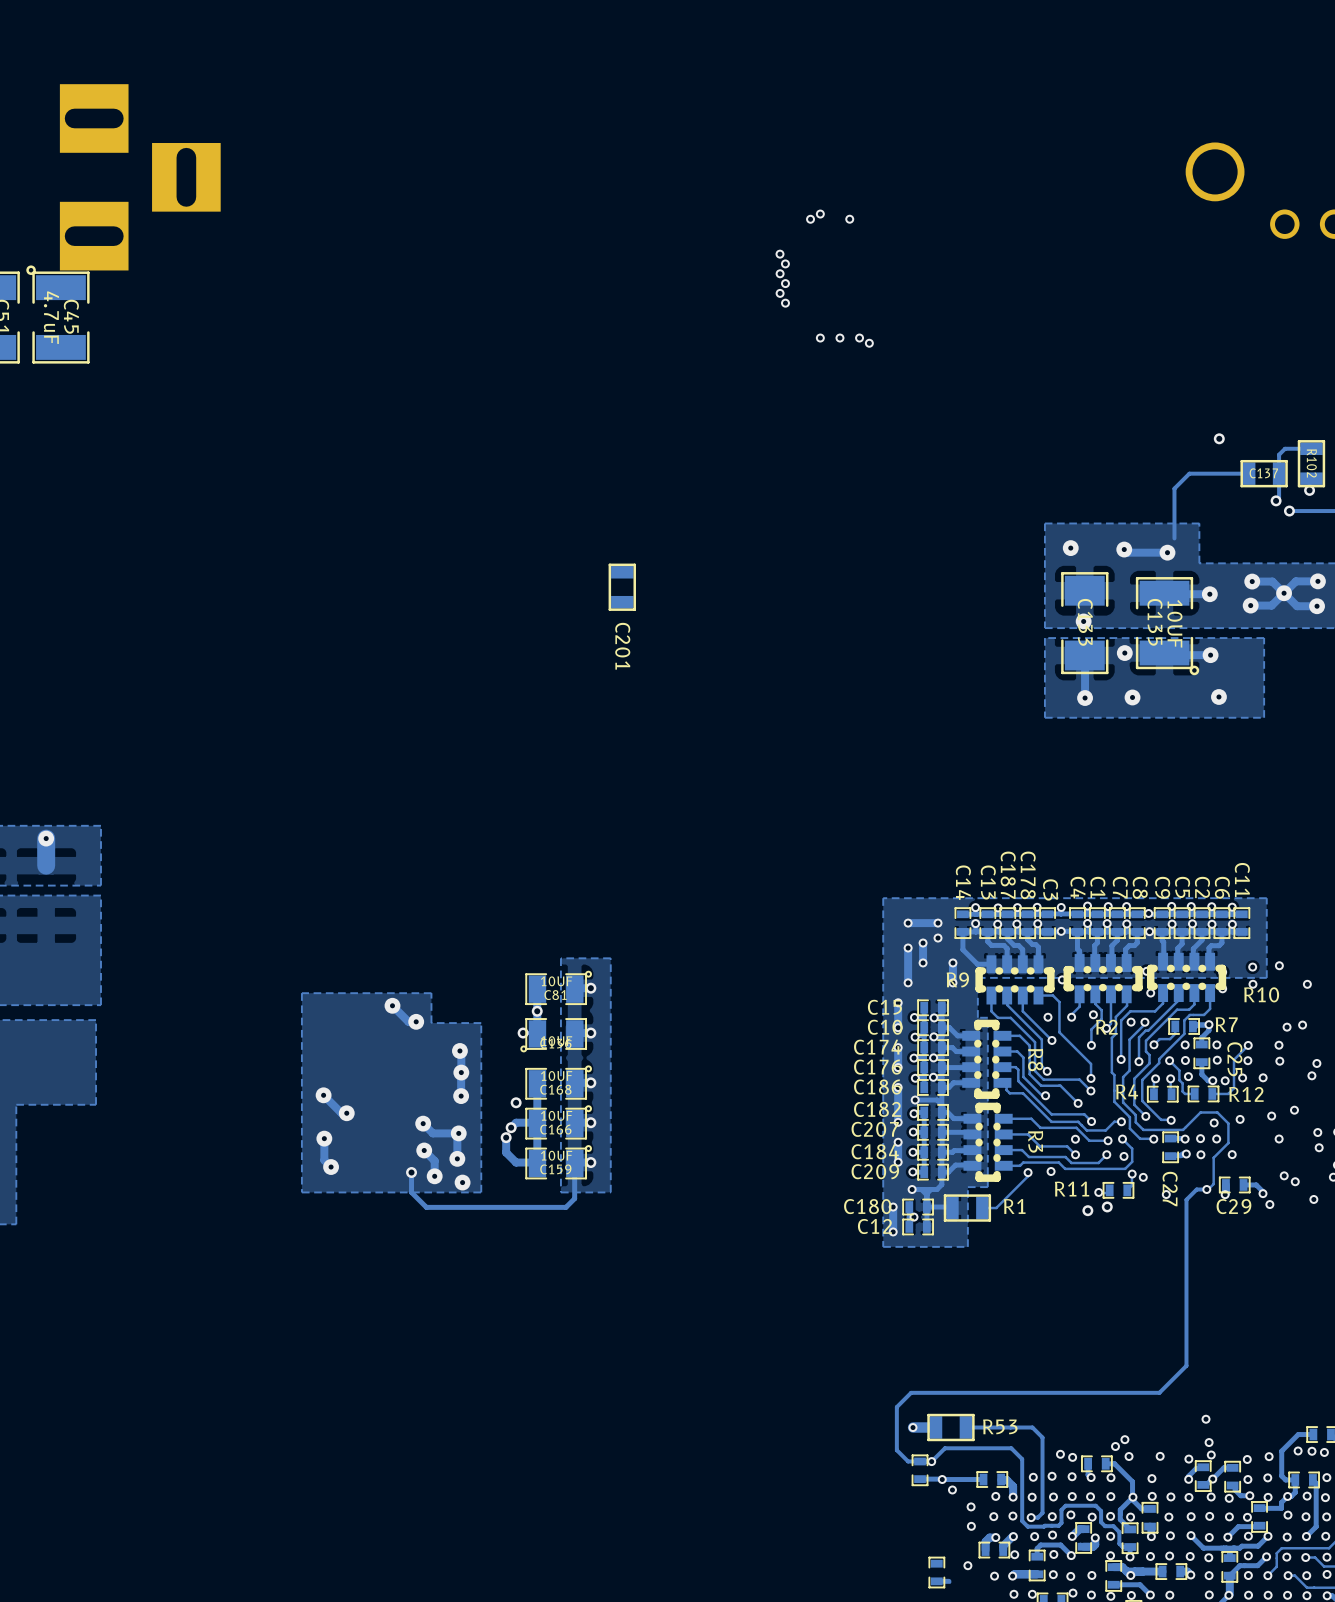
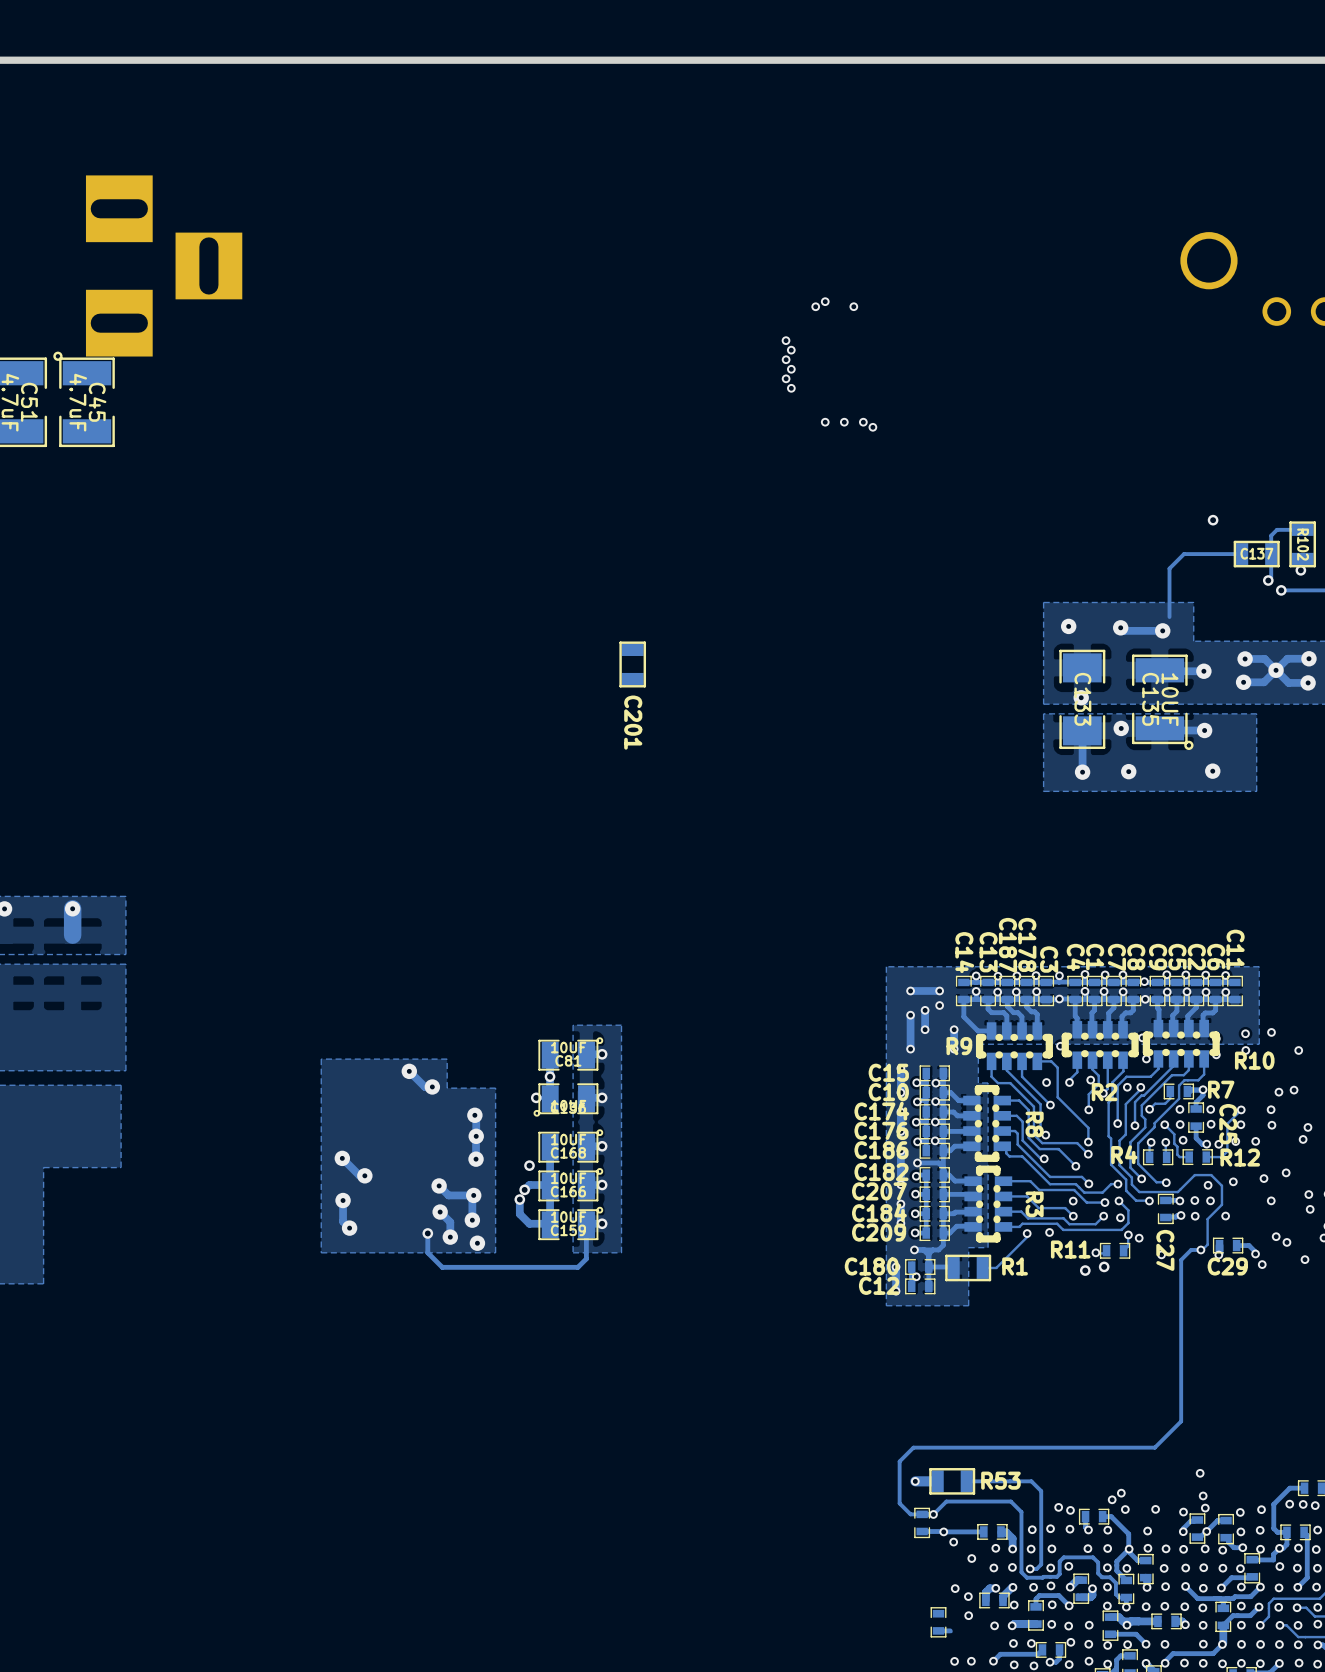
via: (1072, 1496) -> none
via: (1092, 1517) -> none
via: (971, 1526) -> none
via: none -> (955, 1588)
via: none -> (968, 1596)

